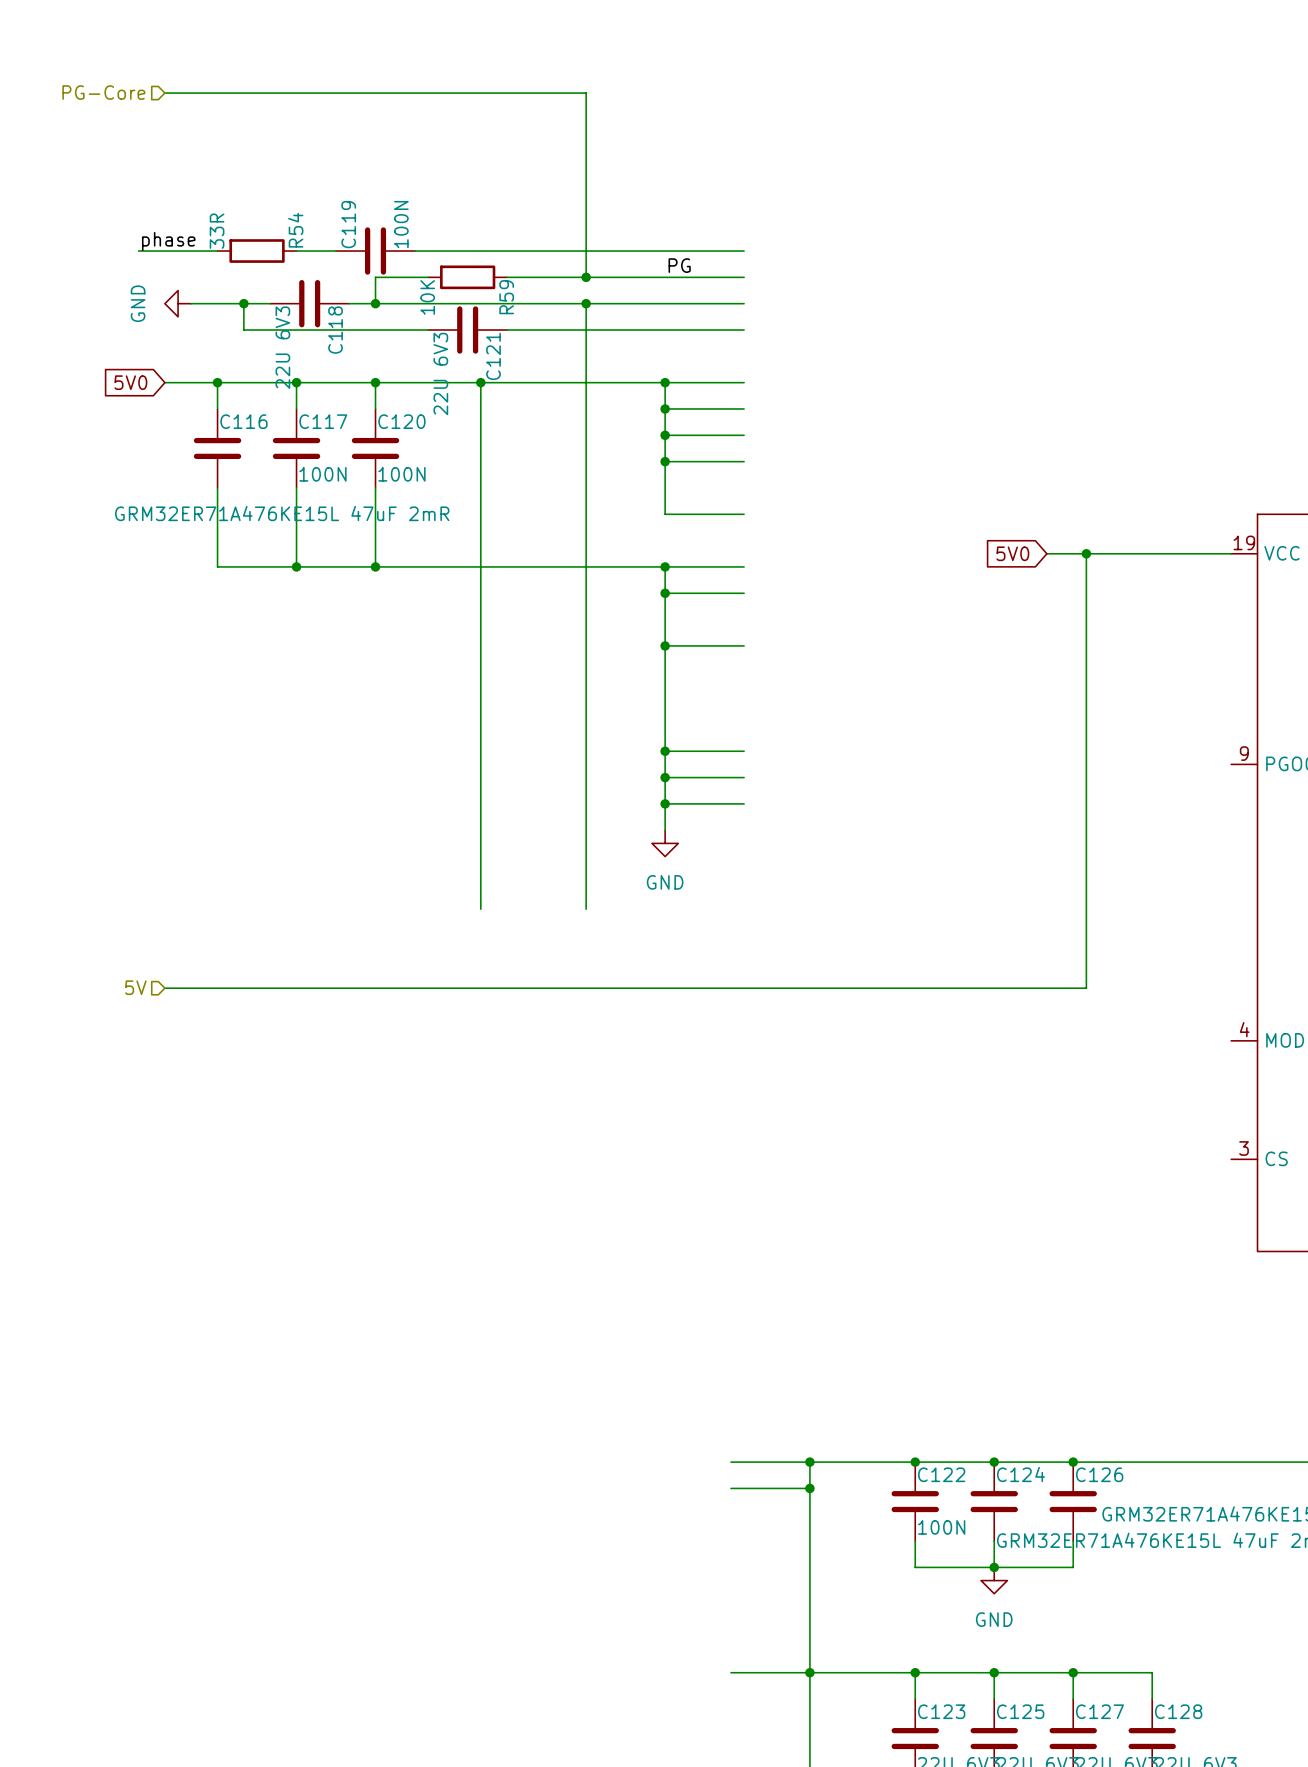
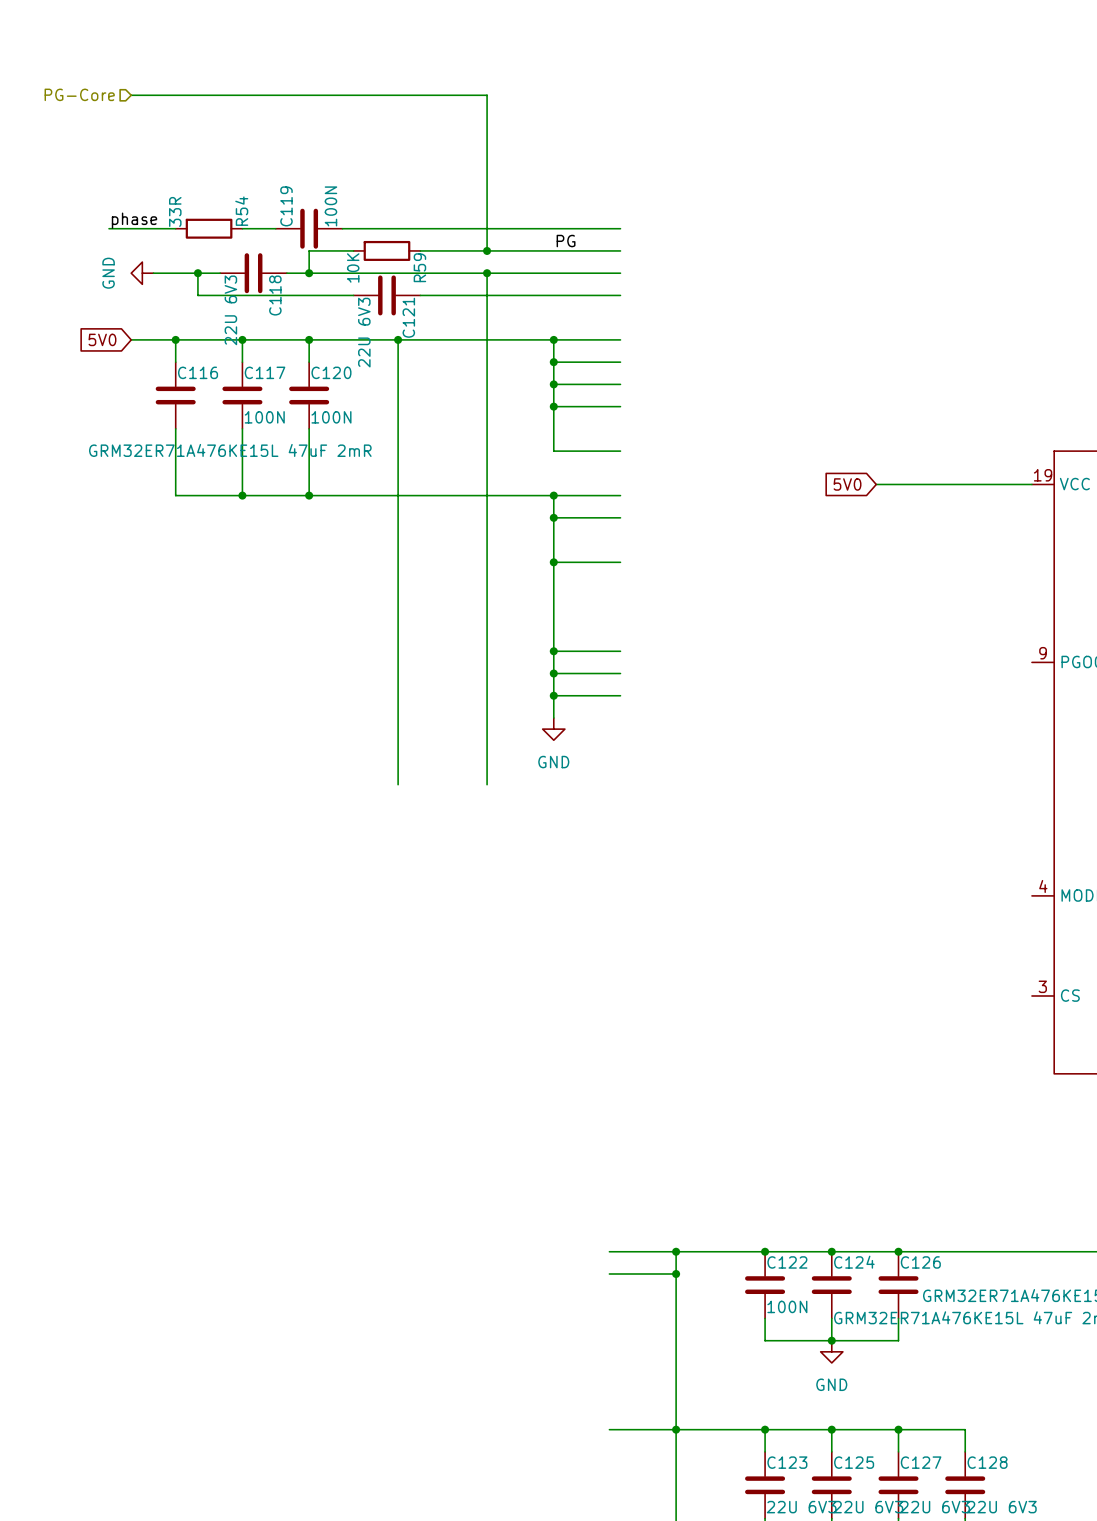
wire: (1086, 553) (1086, 988) (164, 988) -> none
junction: (1086, 553) -> none
hierarchical label: 5V (135, 987) -> none

